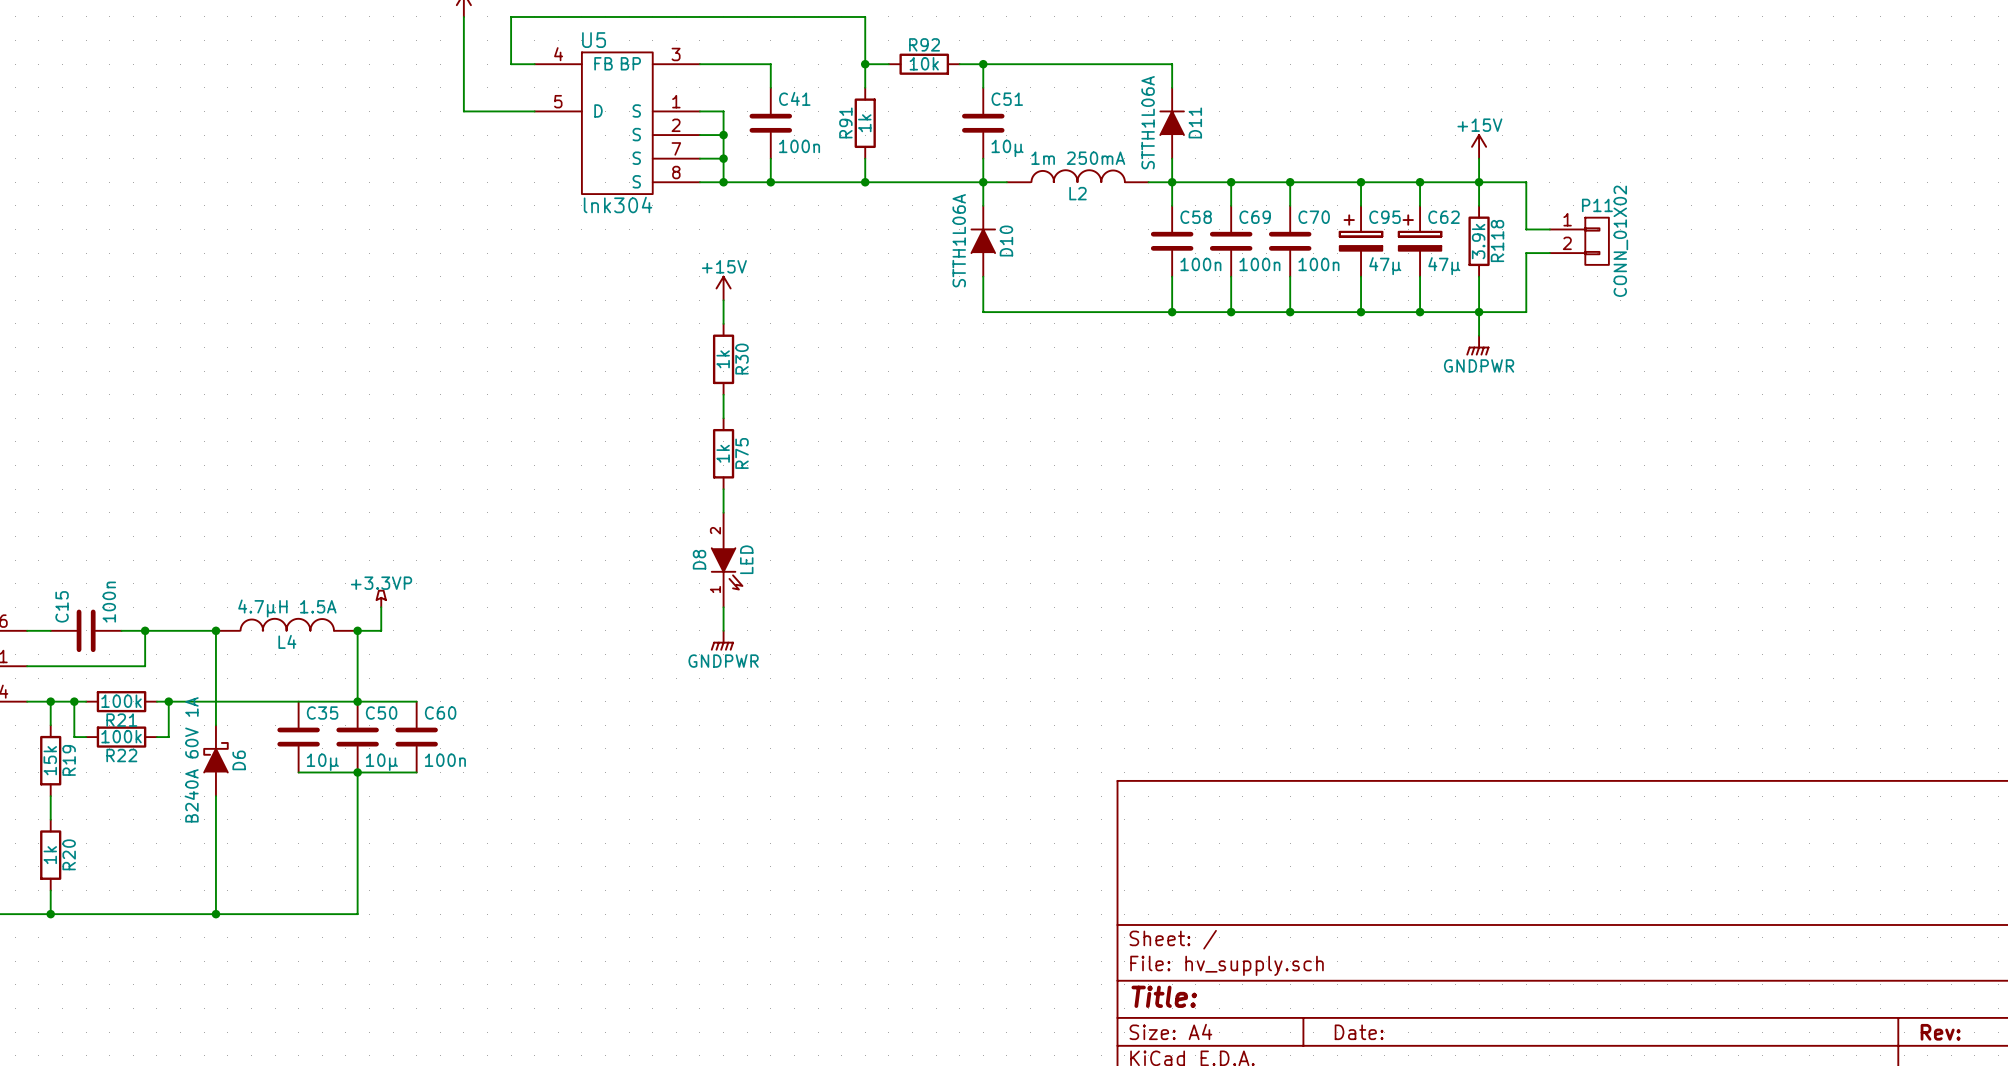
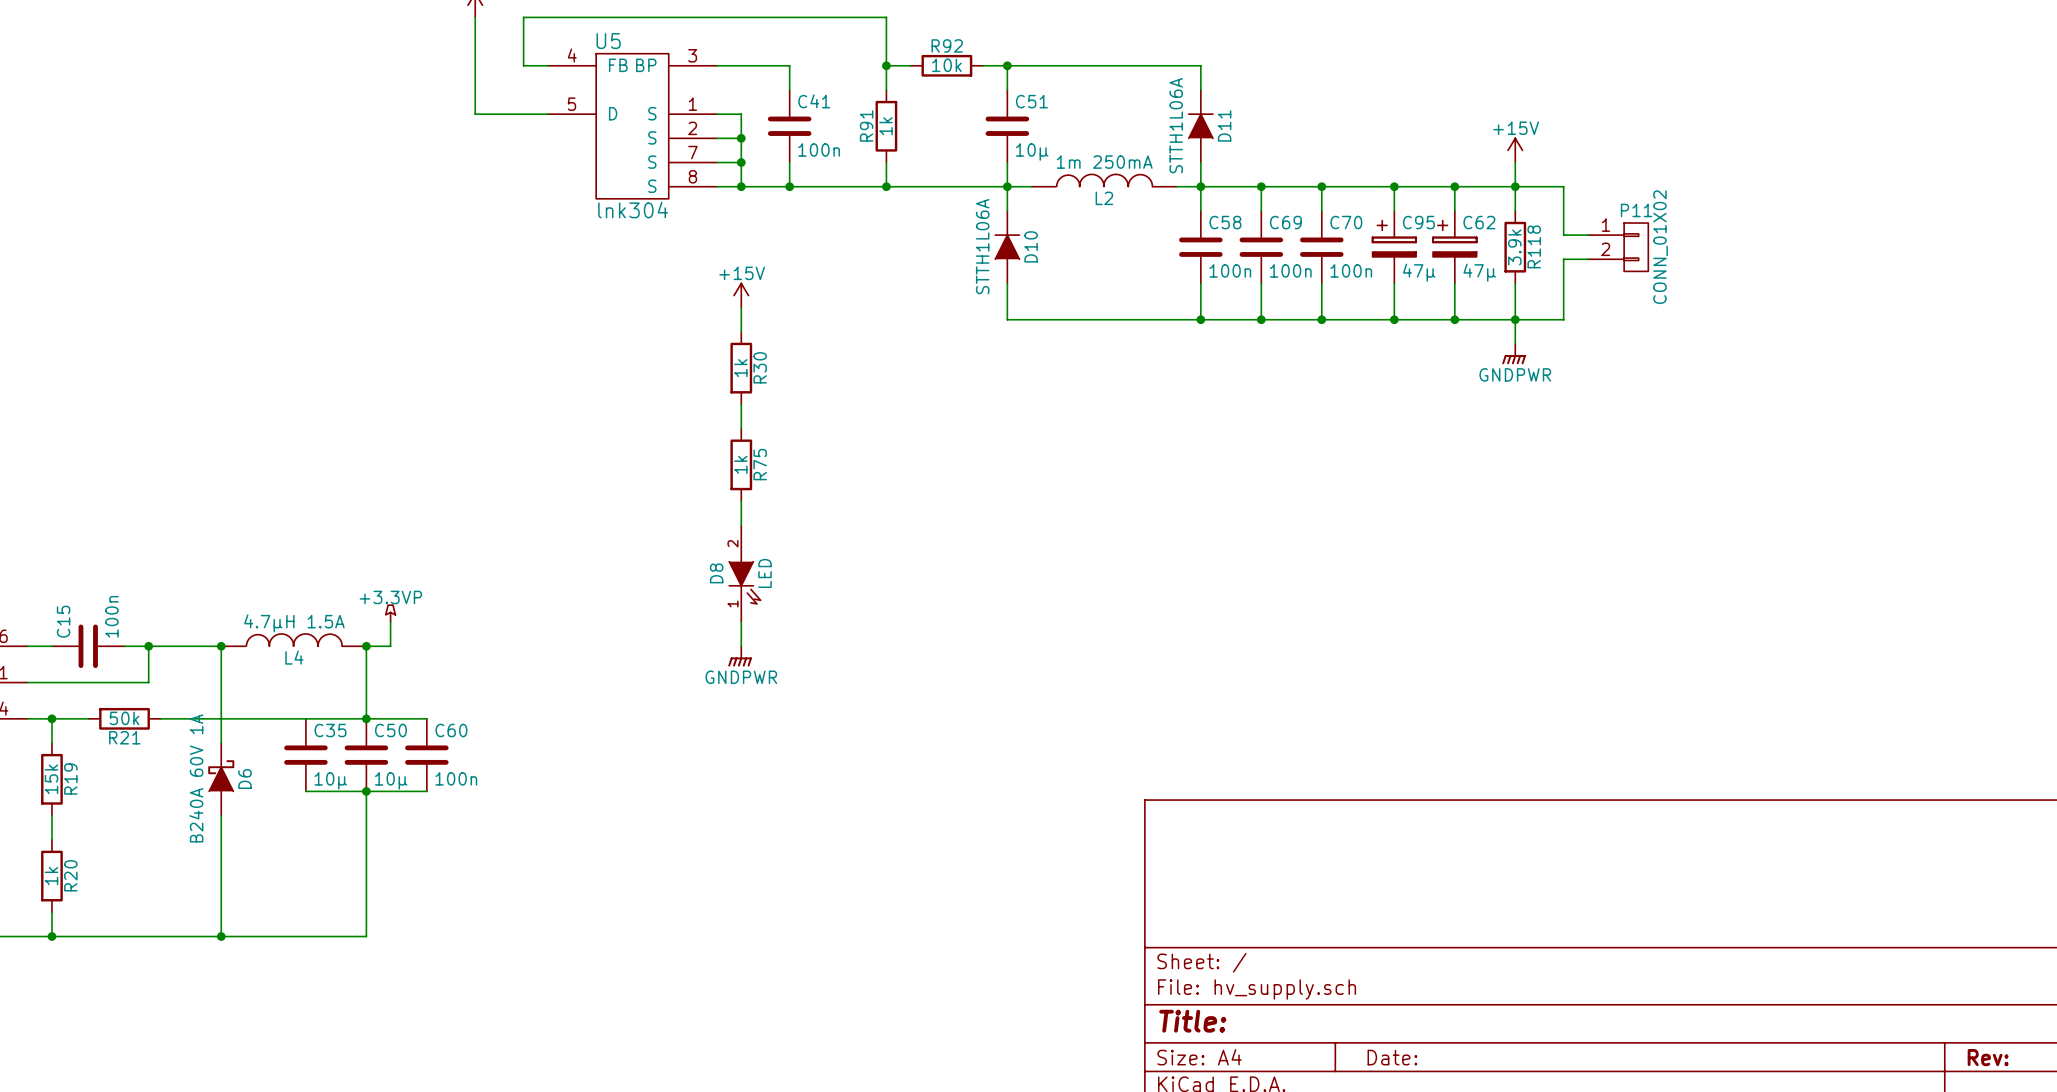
wire: (74, 701) (74, 737) (86, 737) -> none
junction: (74, 701) -> none
R21 value: 100k (121, 701) -> 50k (124, 718)
wire: (168, 701) (168, 737) (156, 737) -> none
junction: (168, 701) -> none
R22: 100k (121, 737) -> none

